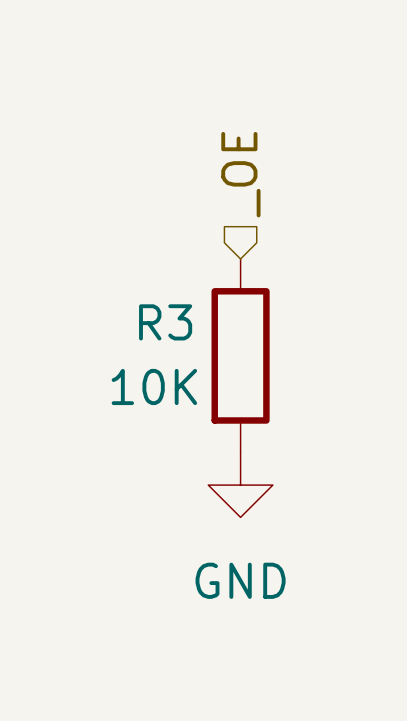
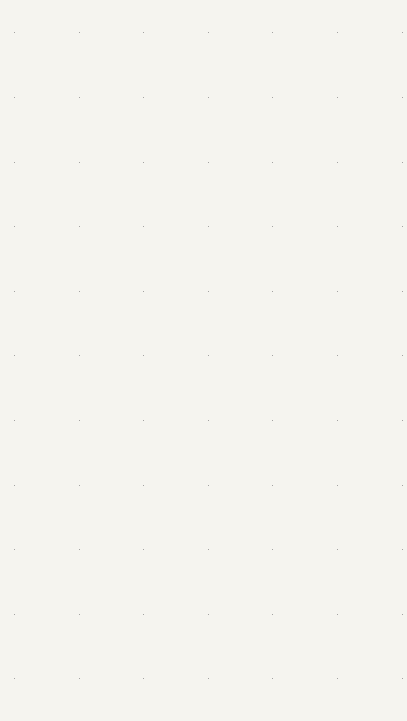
hierarchical label: _OE (240, 174) -> none
R3: 10K (240, 355) -> none
power symbol: GND (240, 485) -> none

